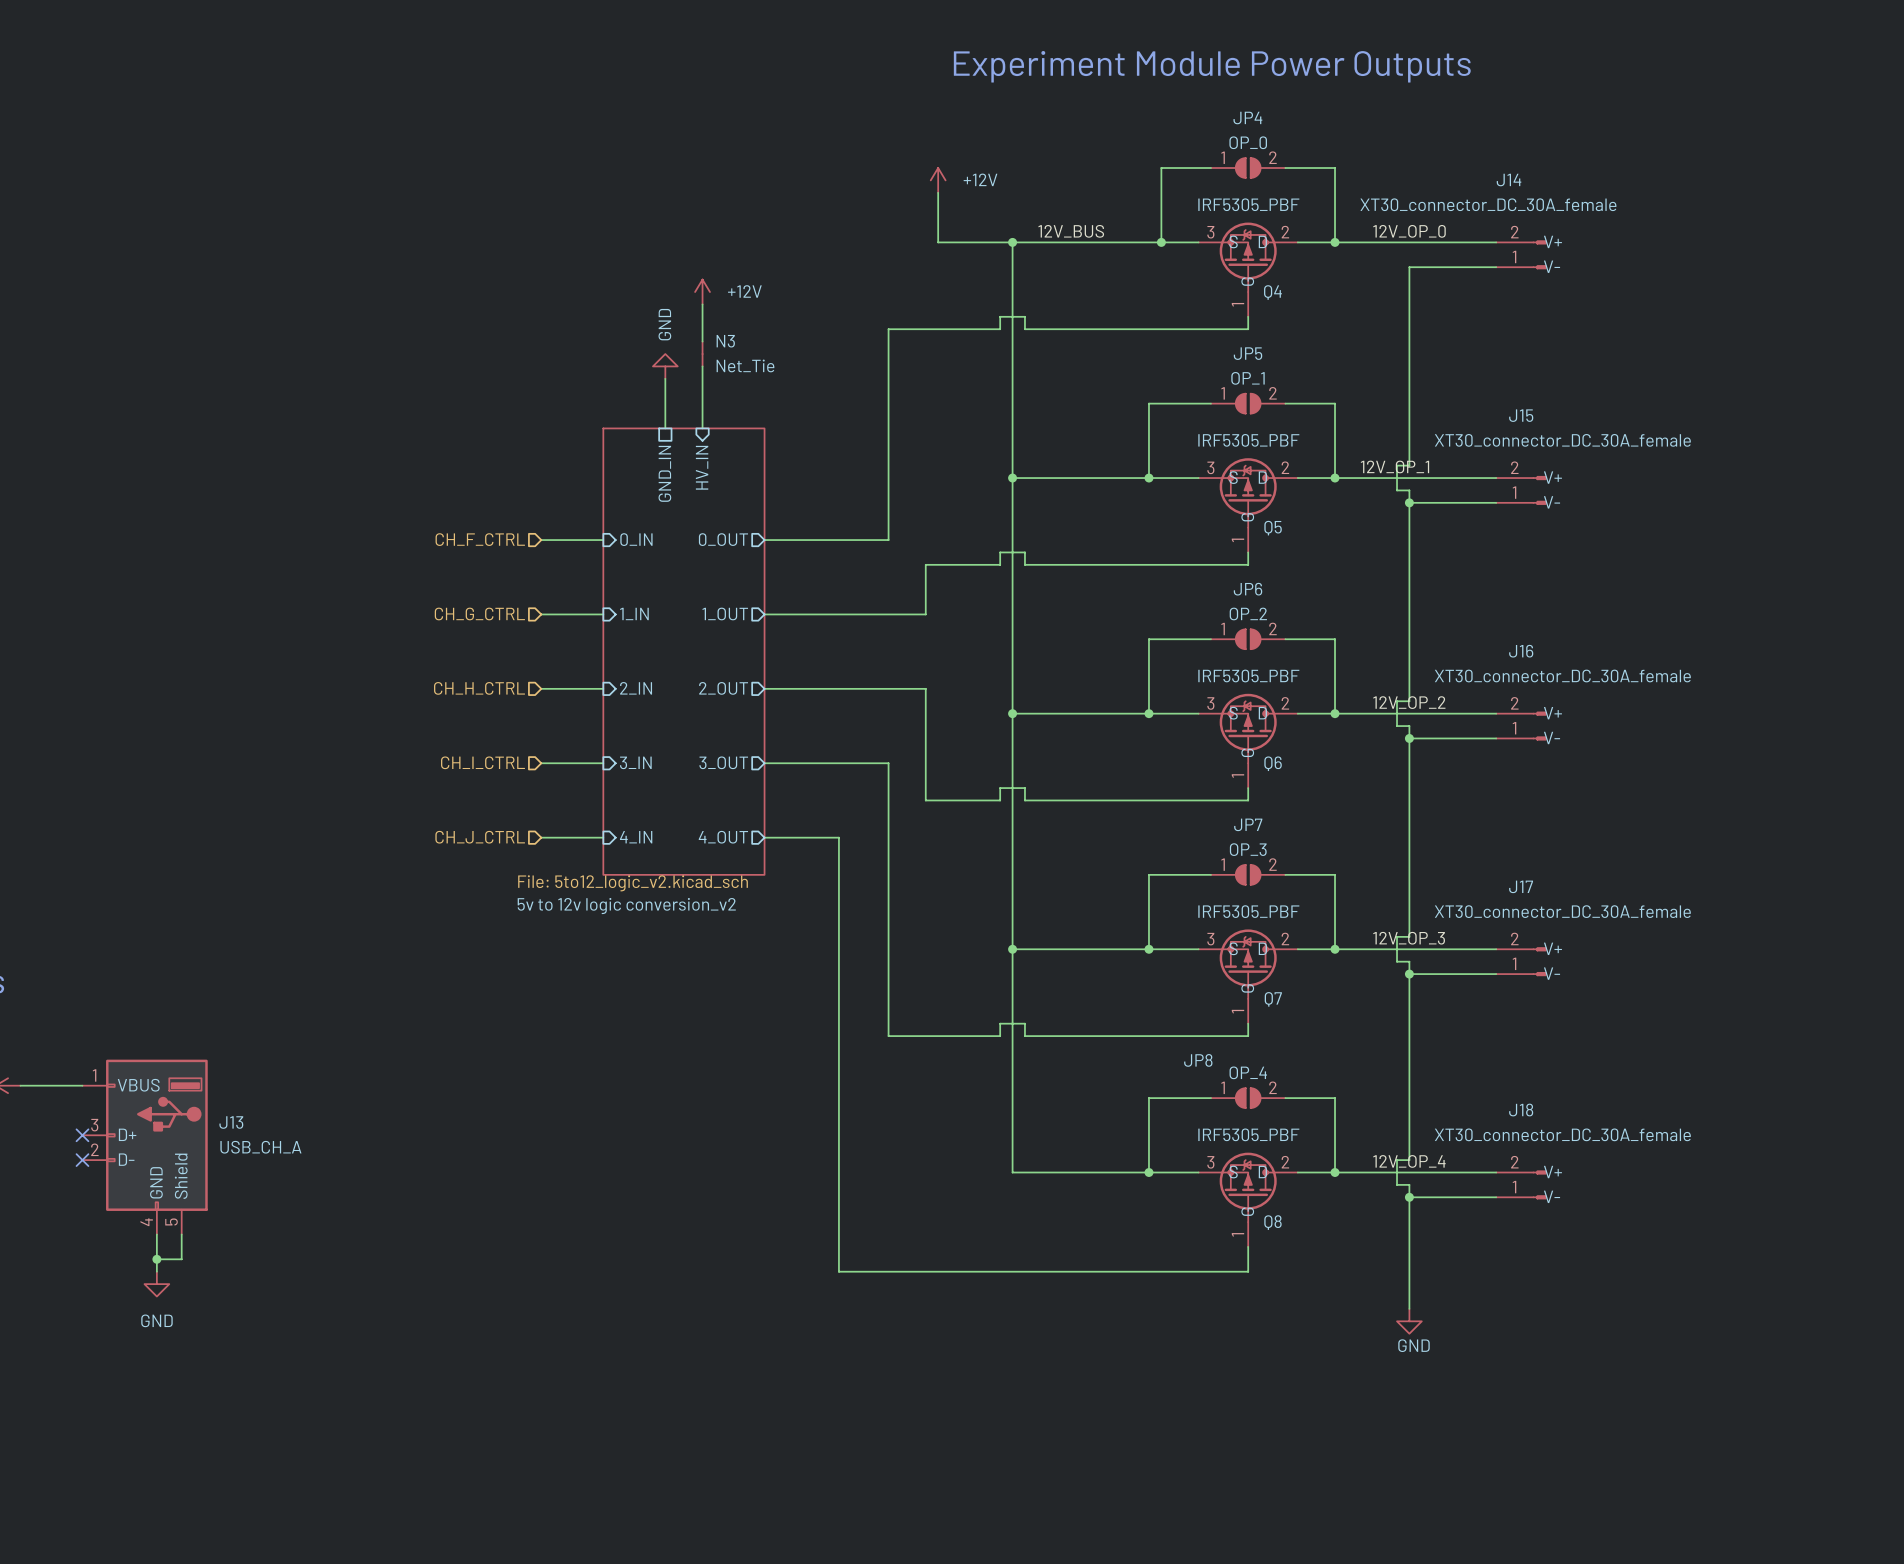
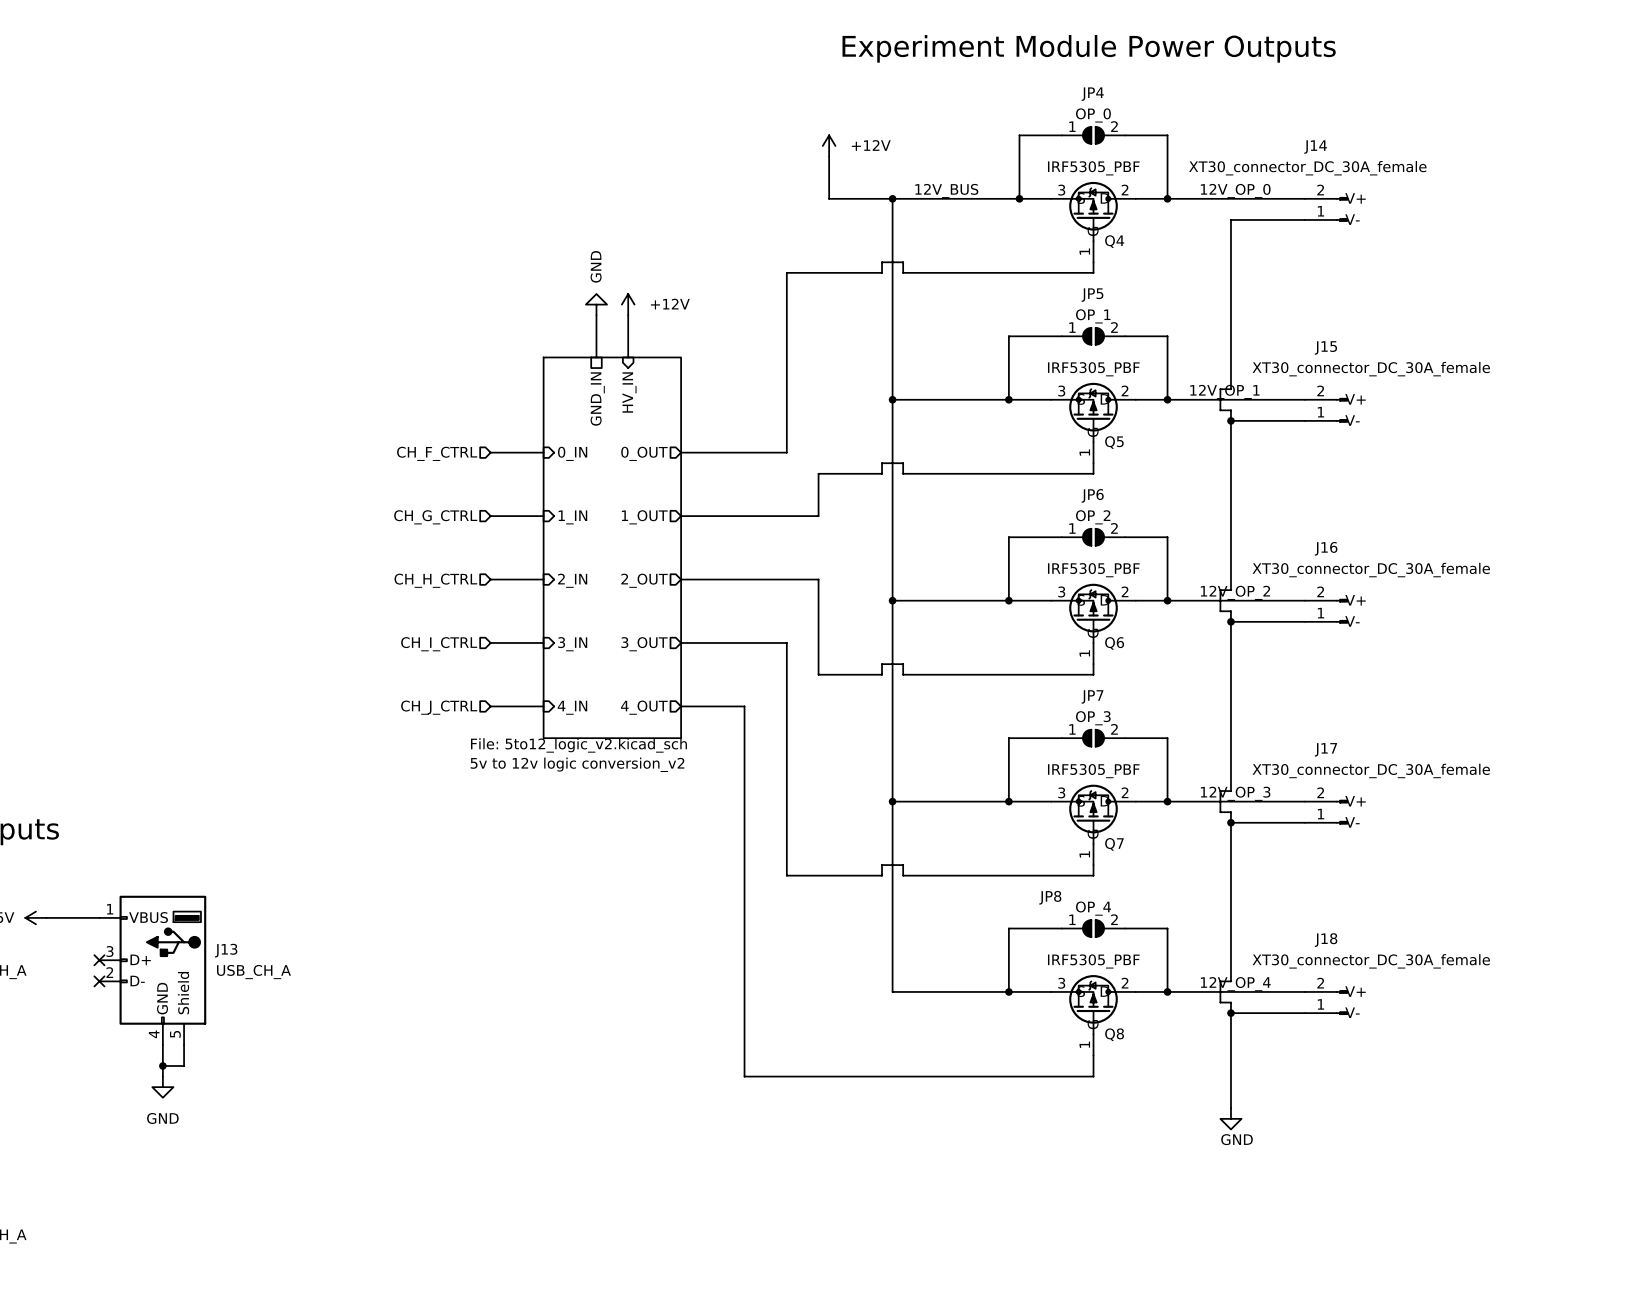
power symbol position: +12V (702, 292) -> +12V (628, 304)
wire: (702, 304) (702, 341) -> none
N3: Net_Tie (702, 354) -> none

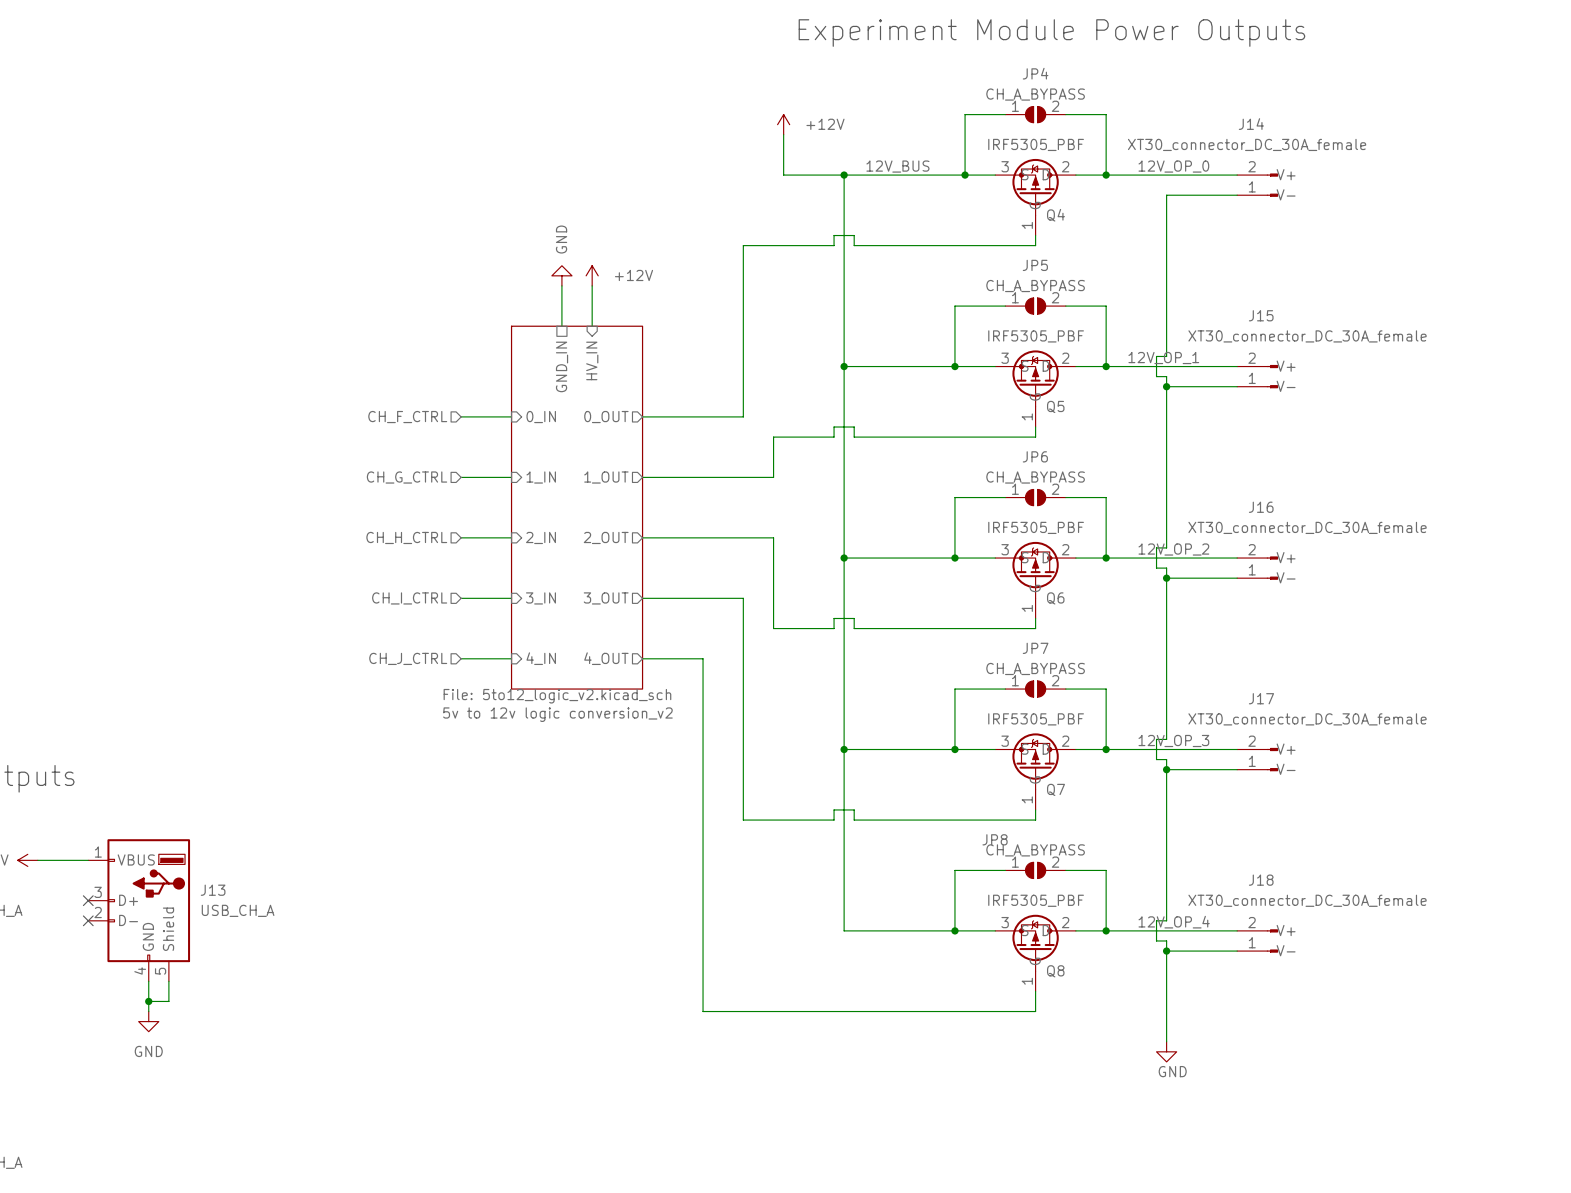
JP4 value: OP_0 (1093, 115) -> CH_A_BYPASS (1035, 94)
JP5 value: OP_1 (1093, 316) -> CH_A_BYPASS (1035, 286)
JP6 value: OP_2 (1093, 517) -> CH_A_BYPASS (1035, 477)
JP7 value: OP_3 (1093, 718) -> CH_A_BYPASS (1035, 668)
JP8 value: OP_4 (1093, 908) -> CH_A_BYPASS (1035, 850)

